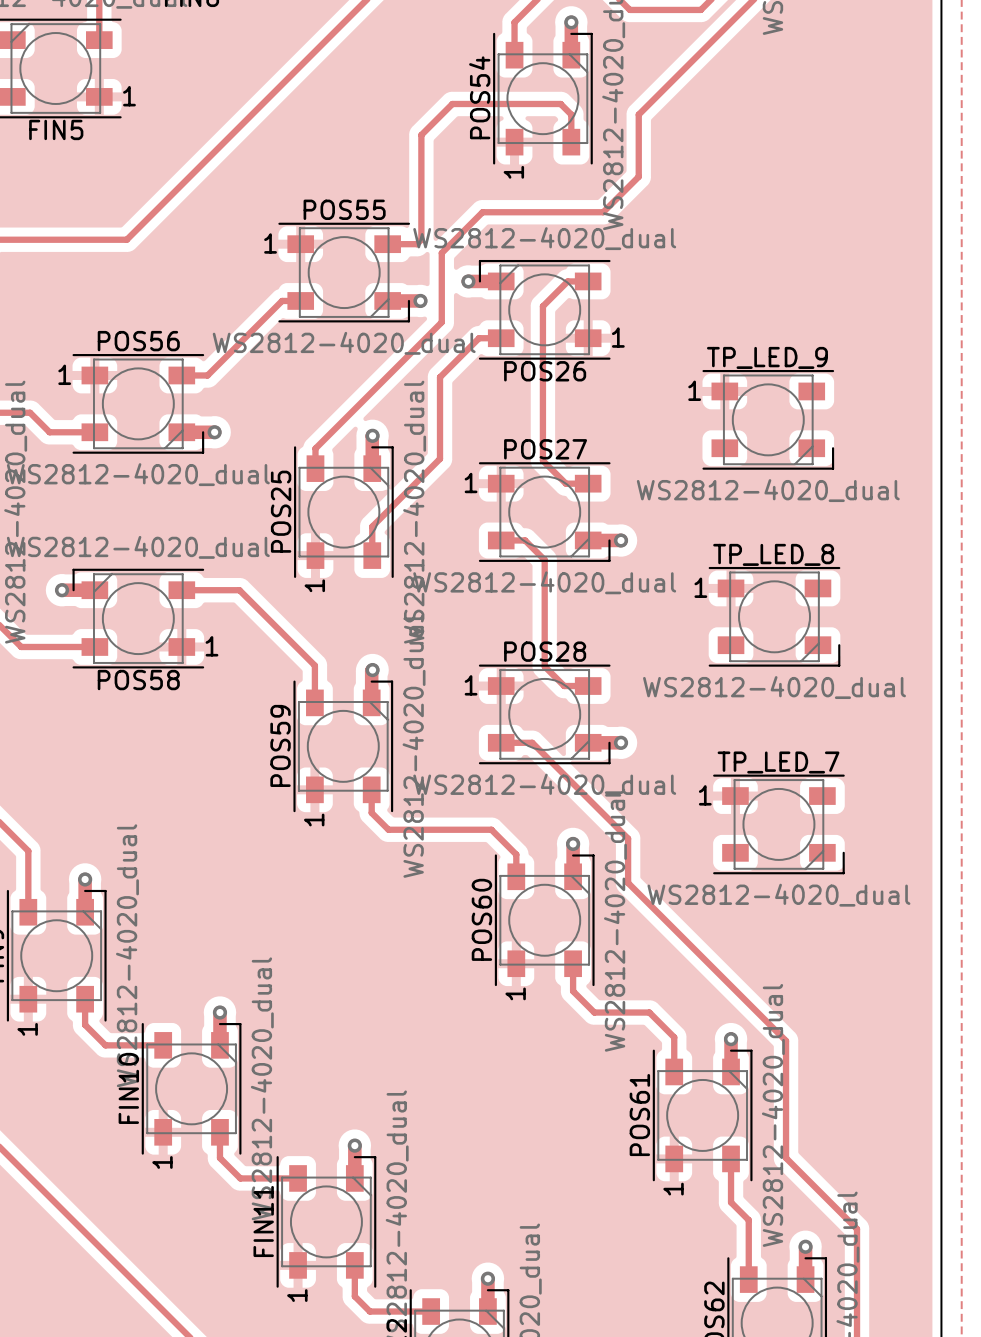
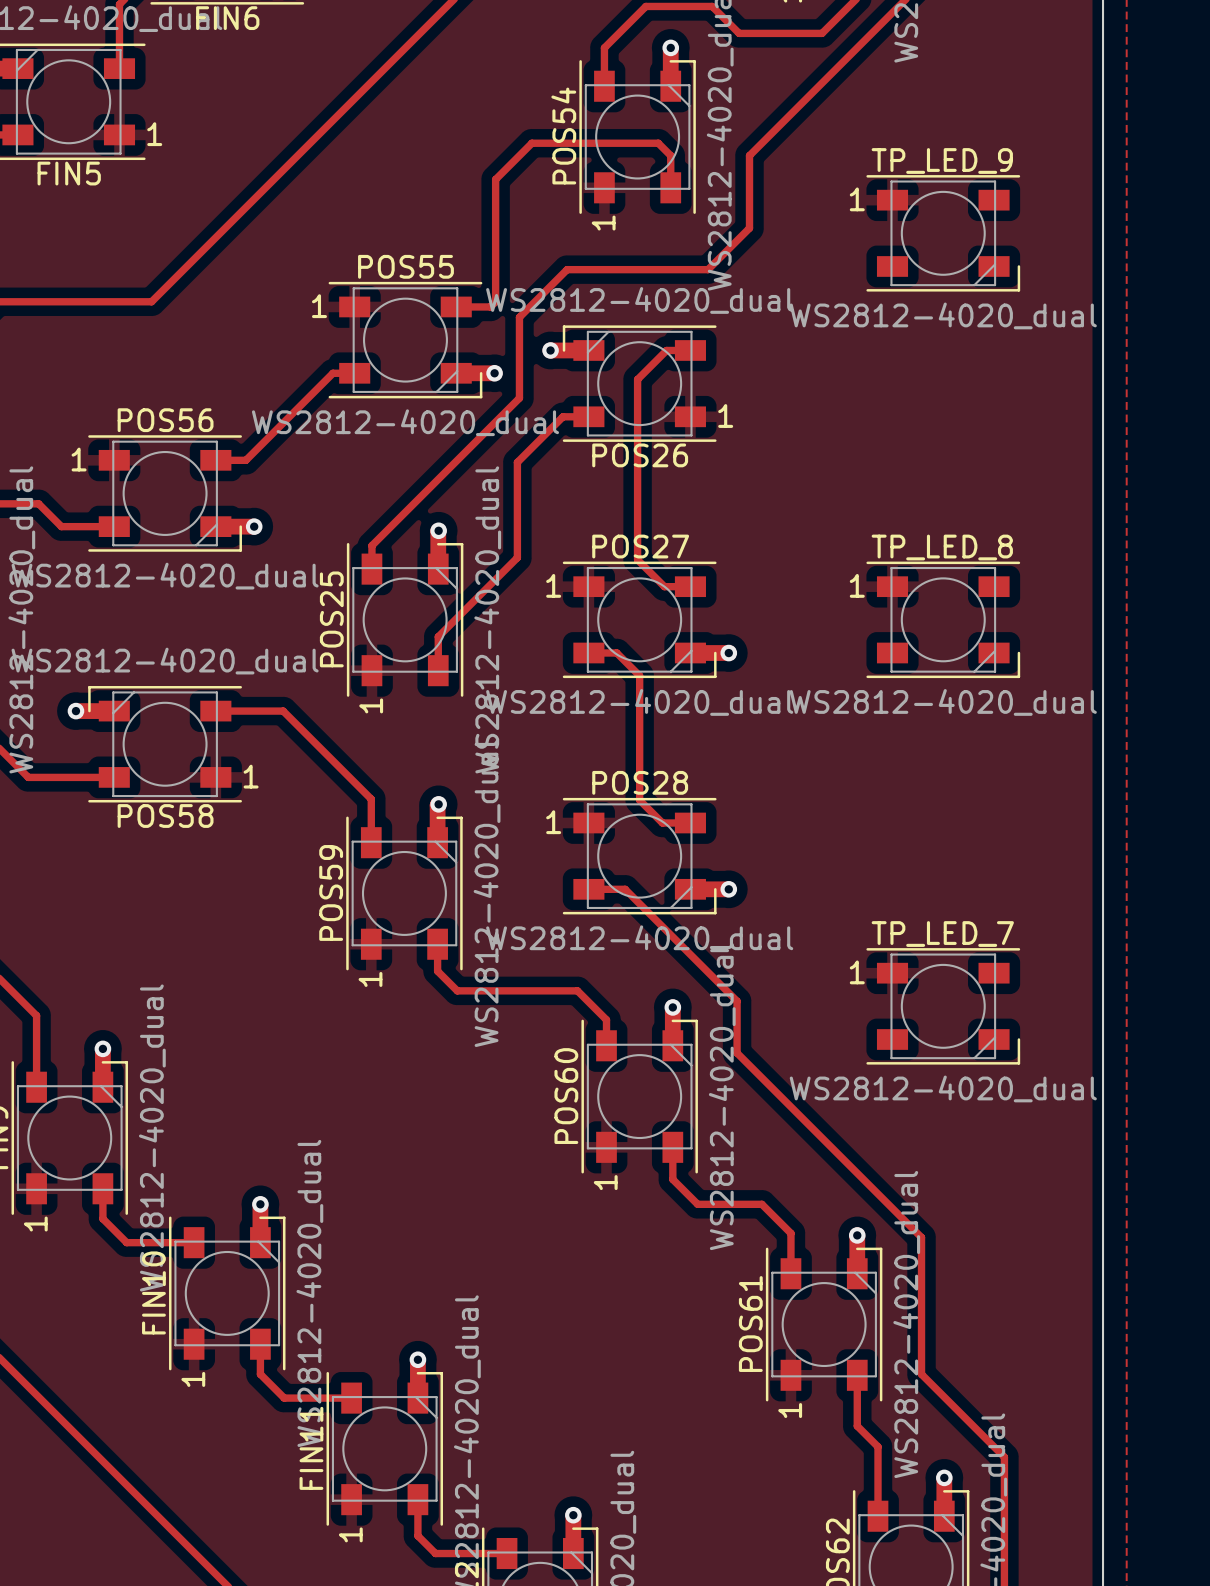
TP_LED_9 position: (768, 419) -> (943, 233)
TP_LED_8 position: (774, 616) -> (943, 619)
TP_LED_7 position: (778, 824) -> (943, 1006)

